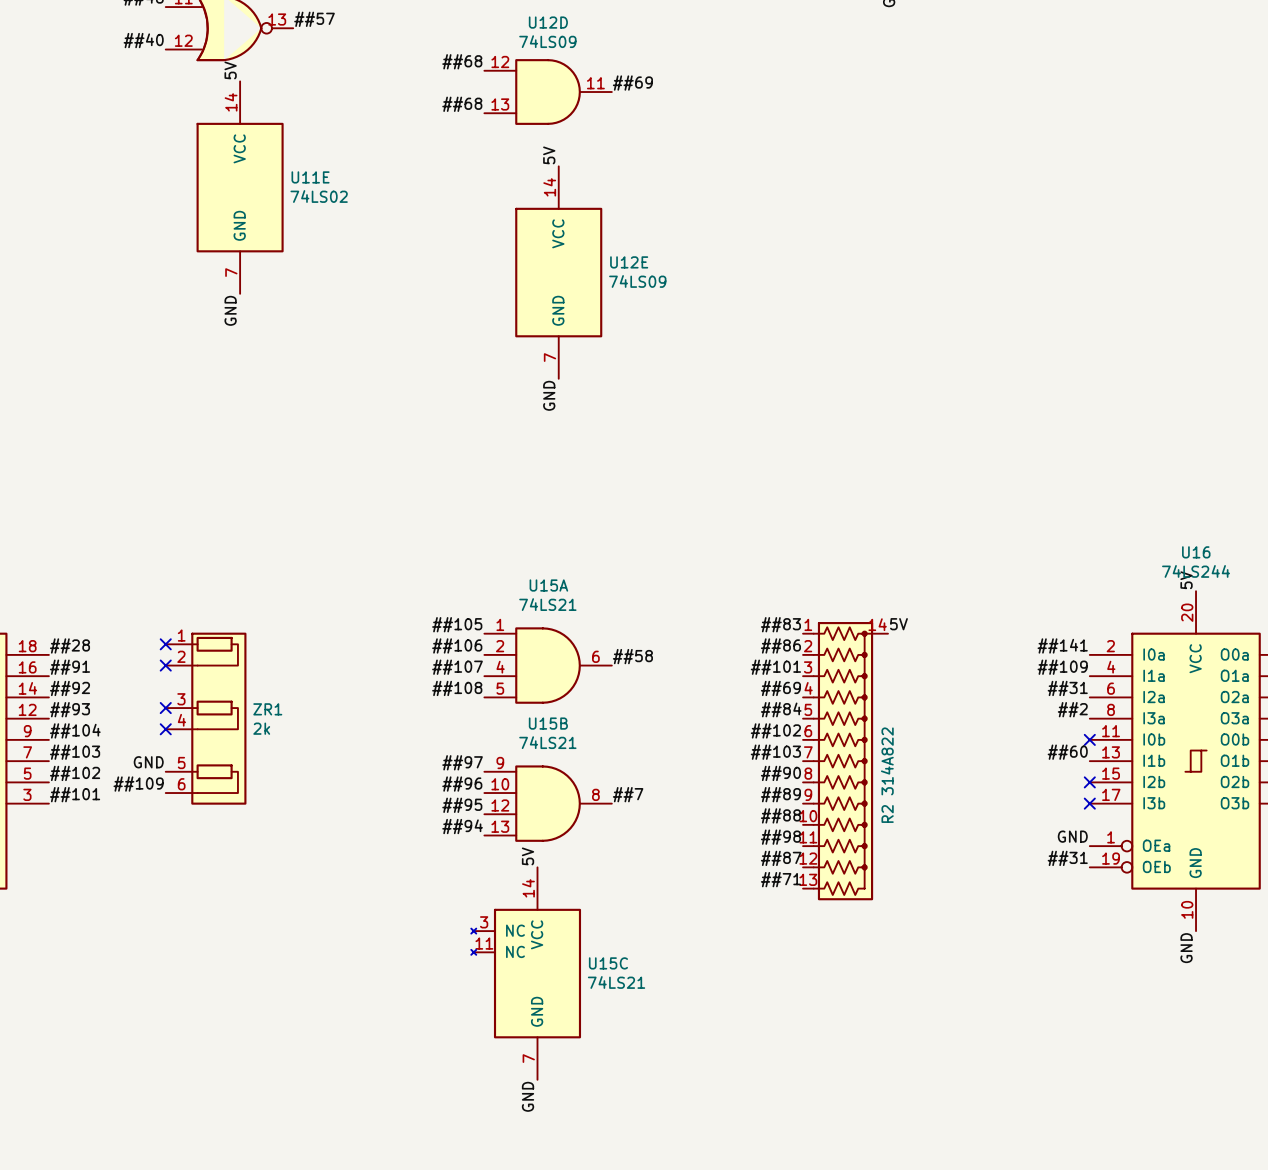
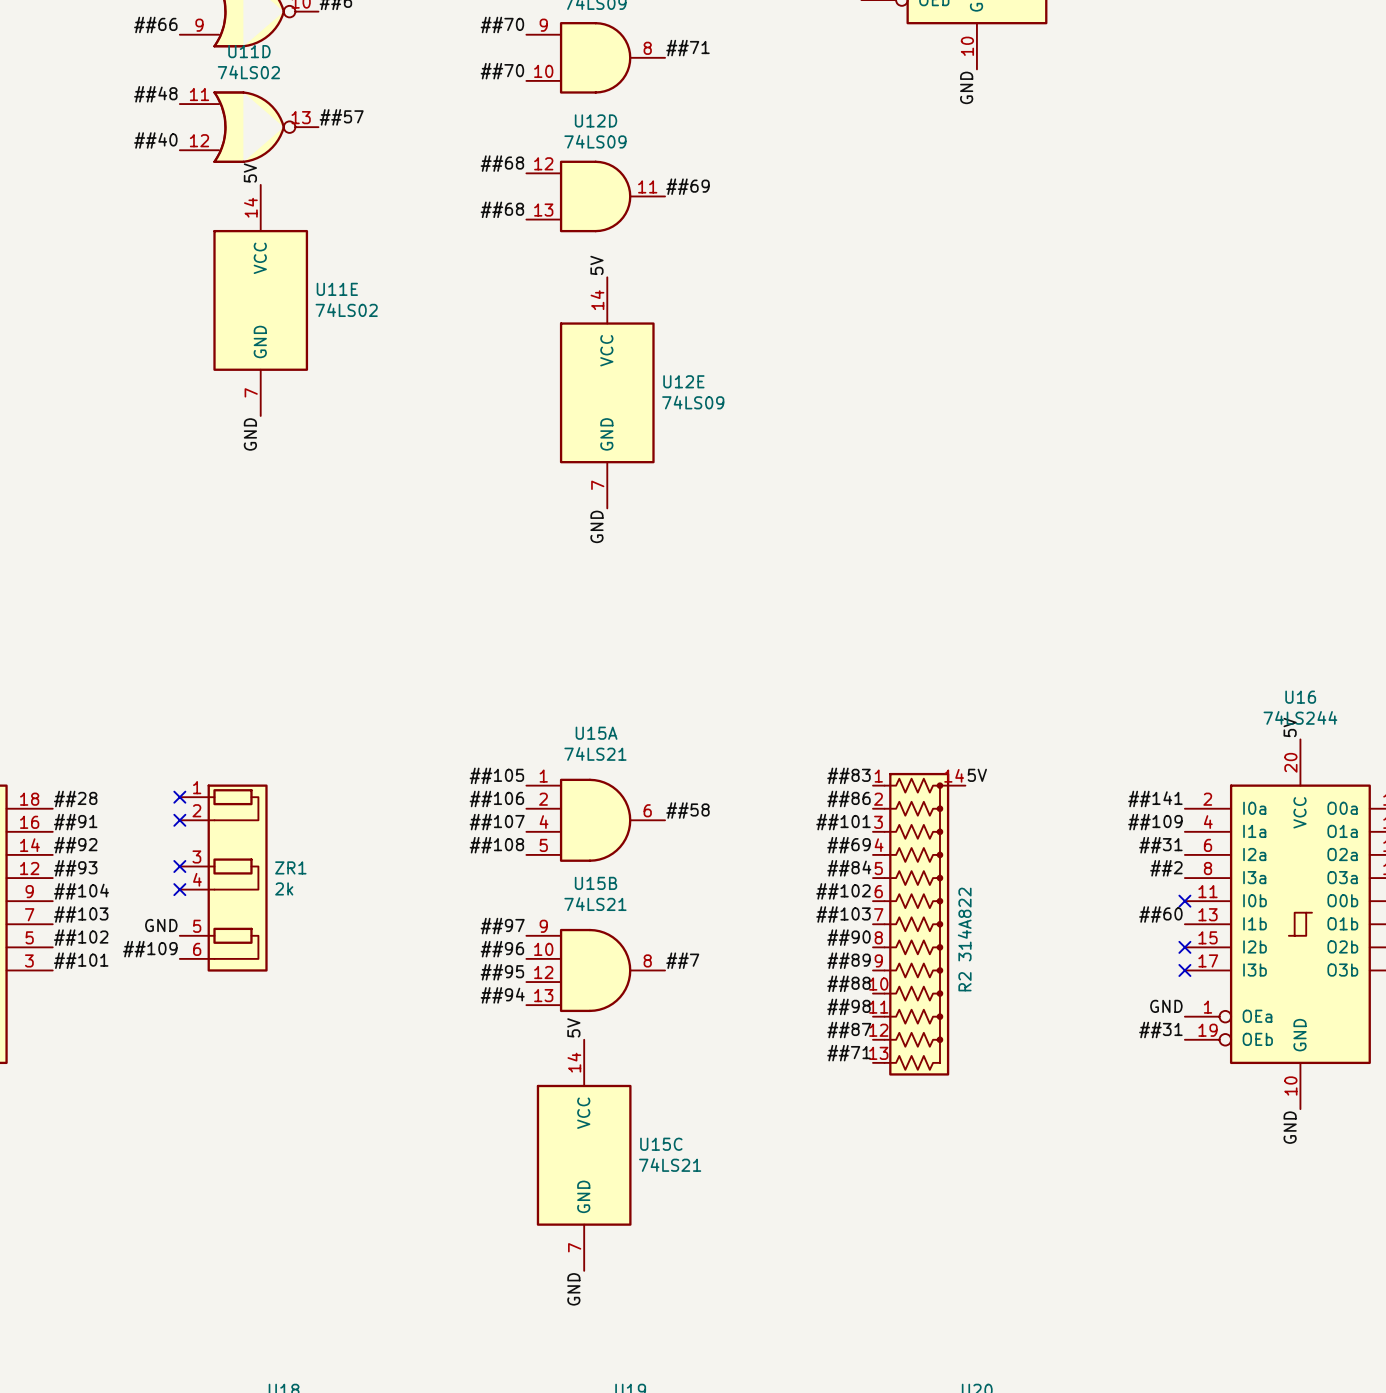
U15C symbol: [471, 867, 582, 1080] -> [536, 1039, 632, 1271]

